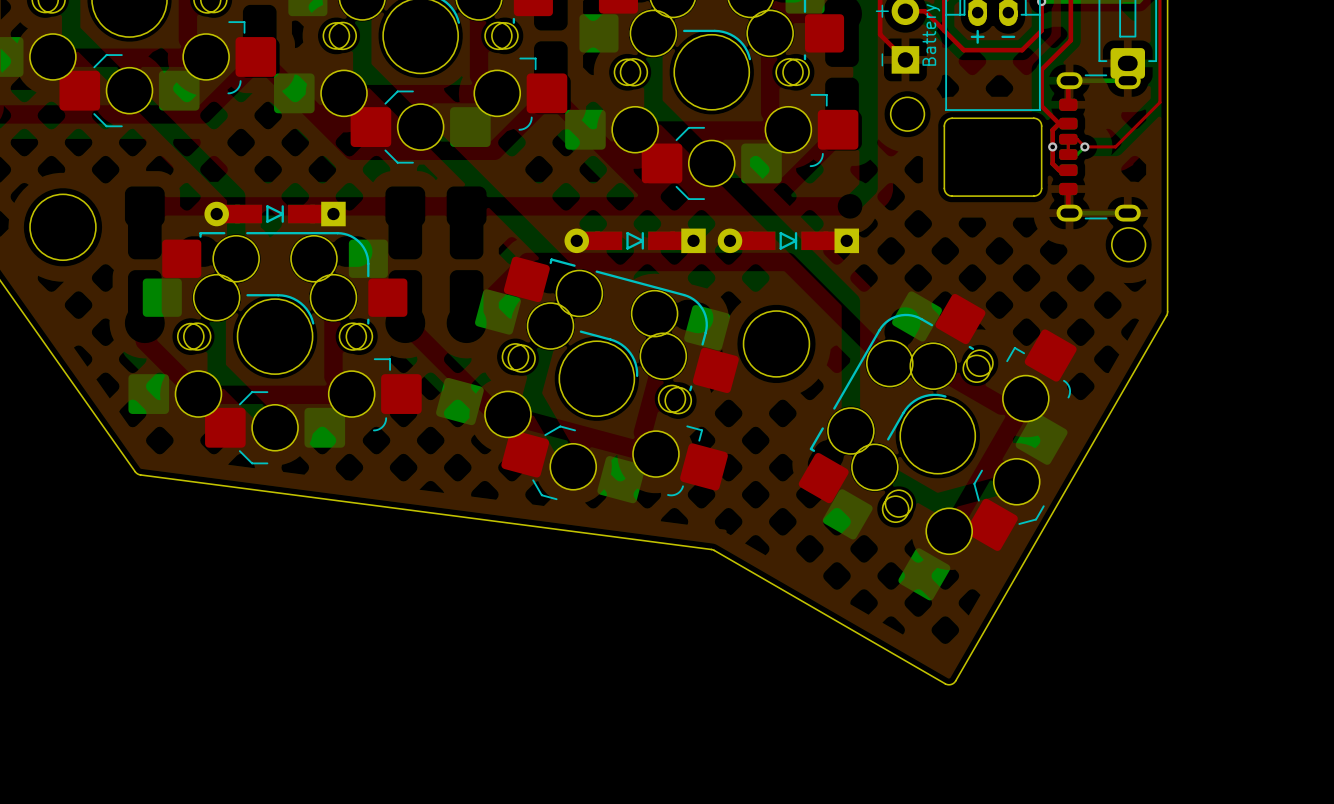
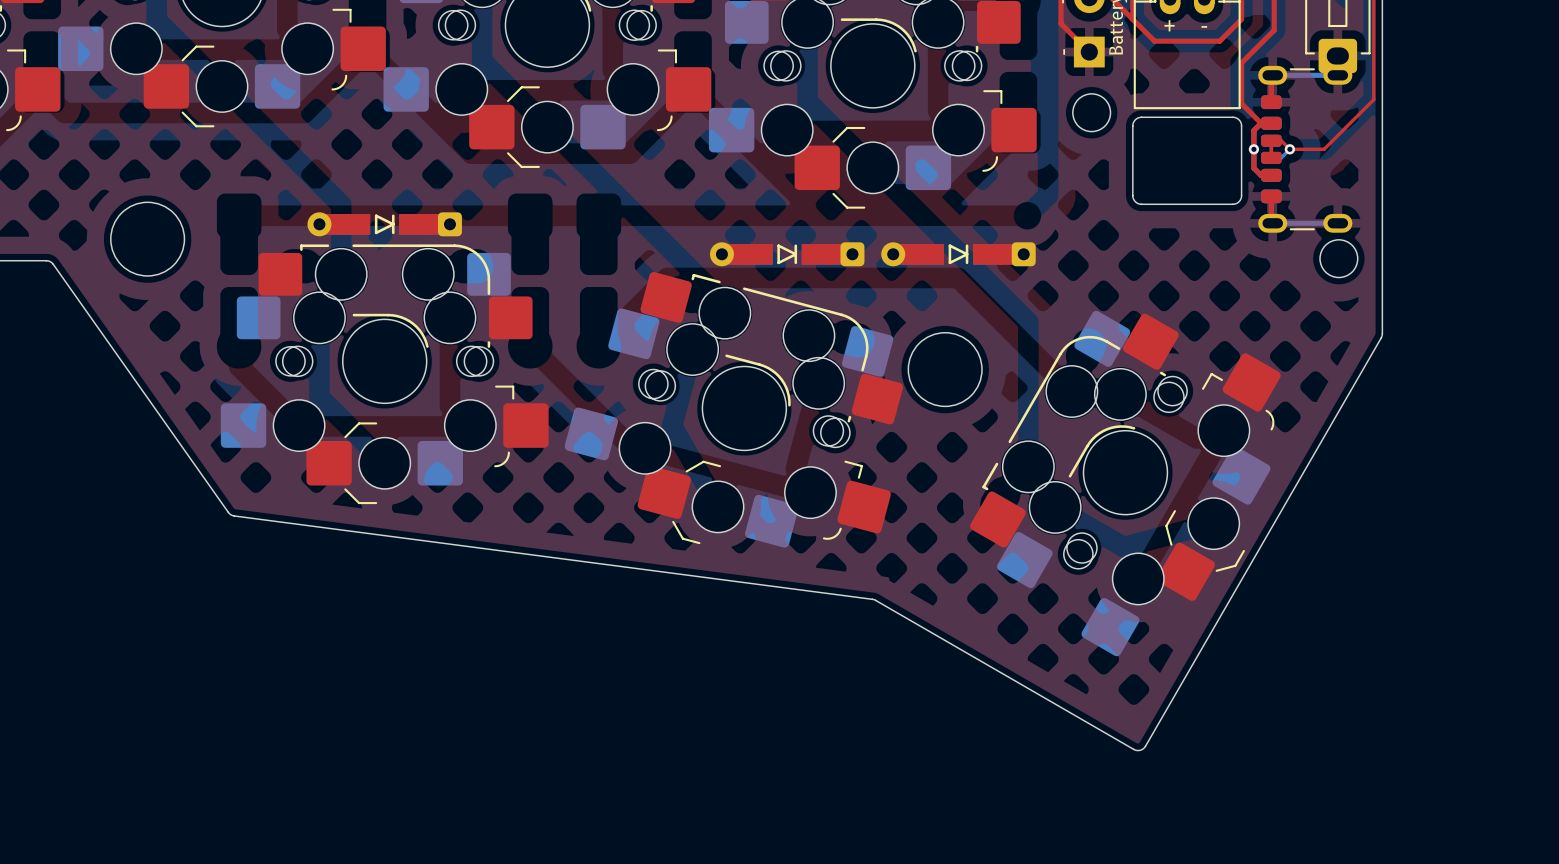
part footprint: [204, 201, 346, 227] -> [307, 212, 462, 237]
part footprint: [564, 228, 706, 254] -> [709, 242, 865, 267]
part footprint: [717, 228, 860, 254] -> [881, 242, 1036, 267]

